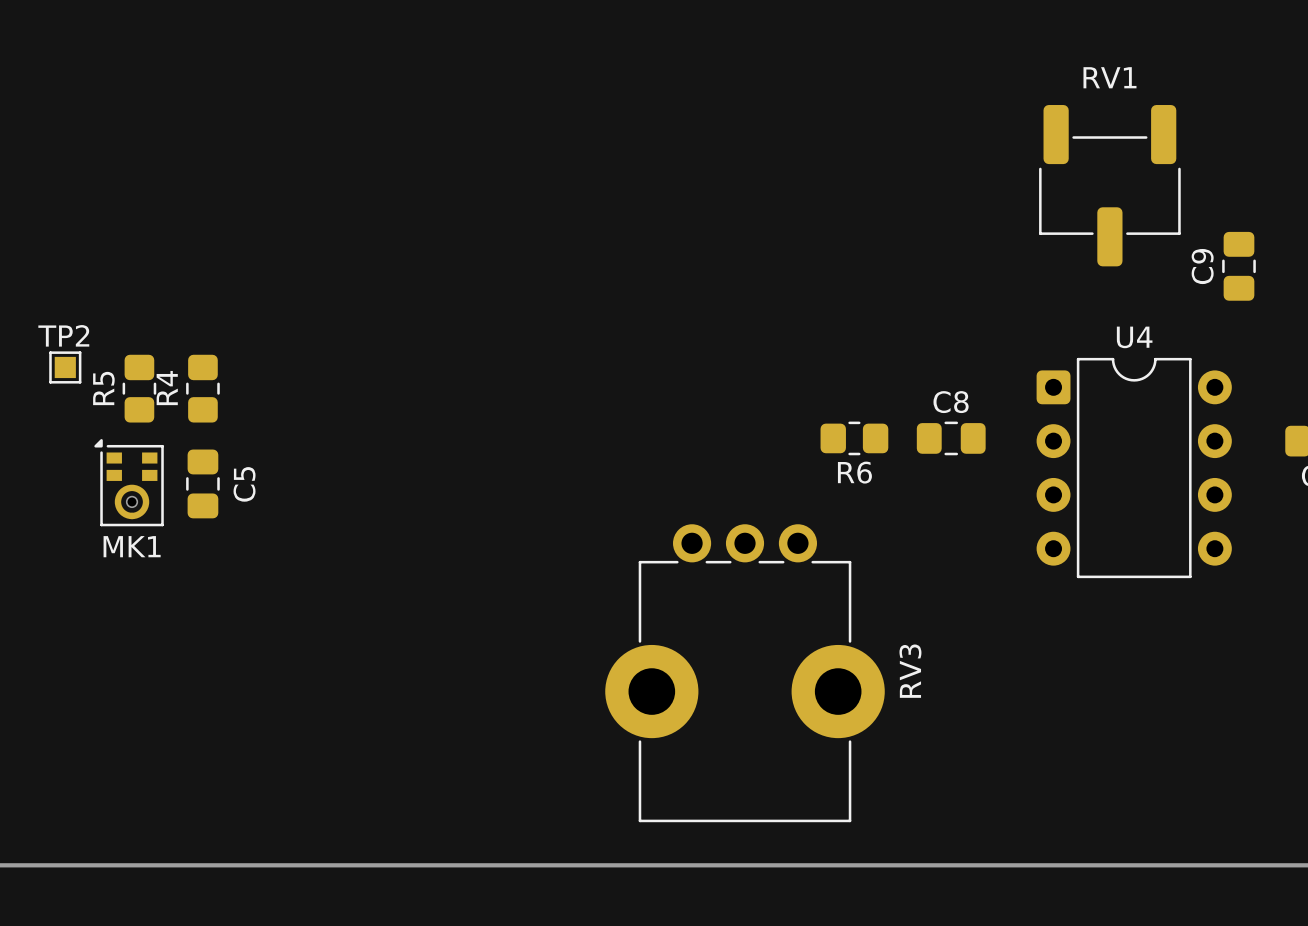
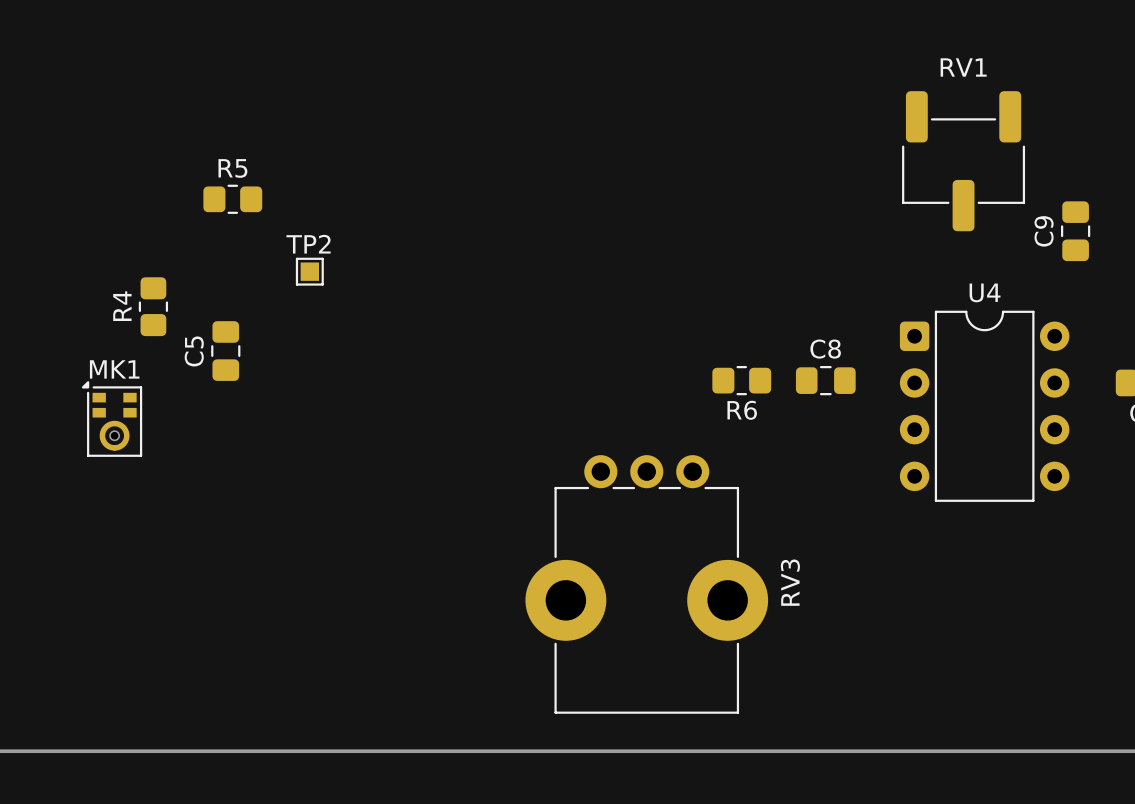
TP2 position: (65, 367) -> (309, 271)
R5 rotation: 0° (139, 388) -> 90° clockwise (232, 199)
R5 position: (139, 388) -> (232, 199)
R4 position: (202, 388) -> (153, 306)
C5 position: (202, 483) -> (225, 351)
C5 name position: C5 (244, 484) -> C5 (194, 351)
MK1 name position: MK1 (132, 546) -> MK1 (114, 369)

